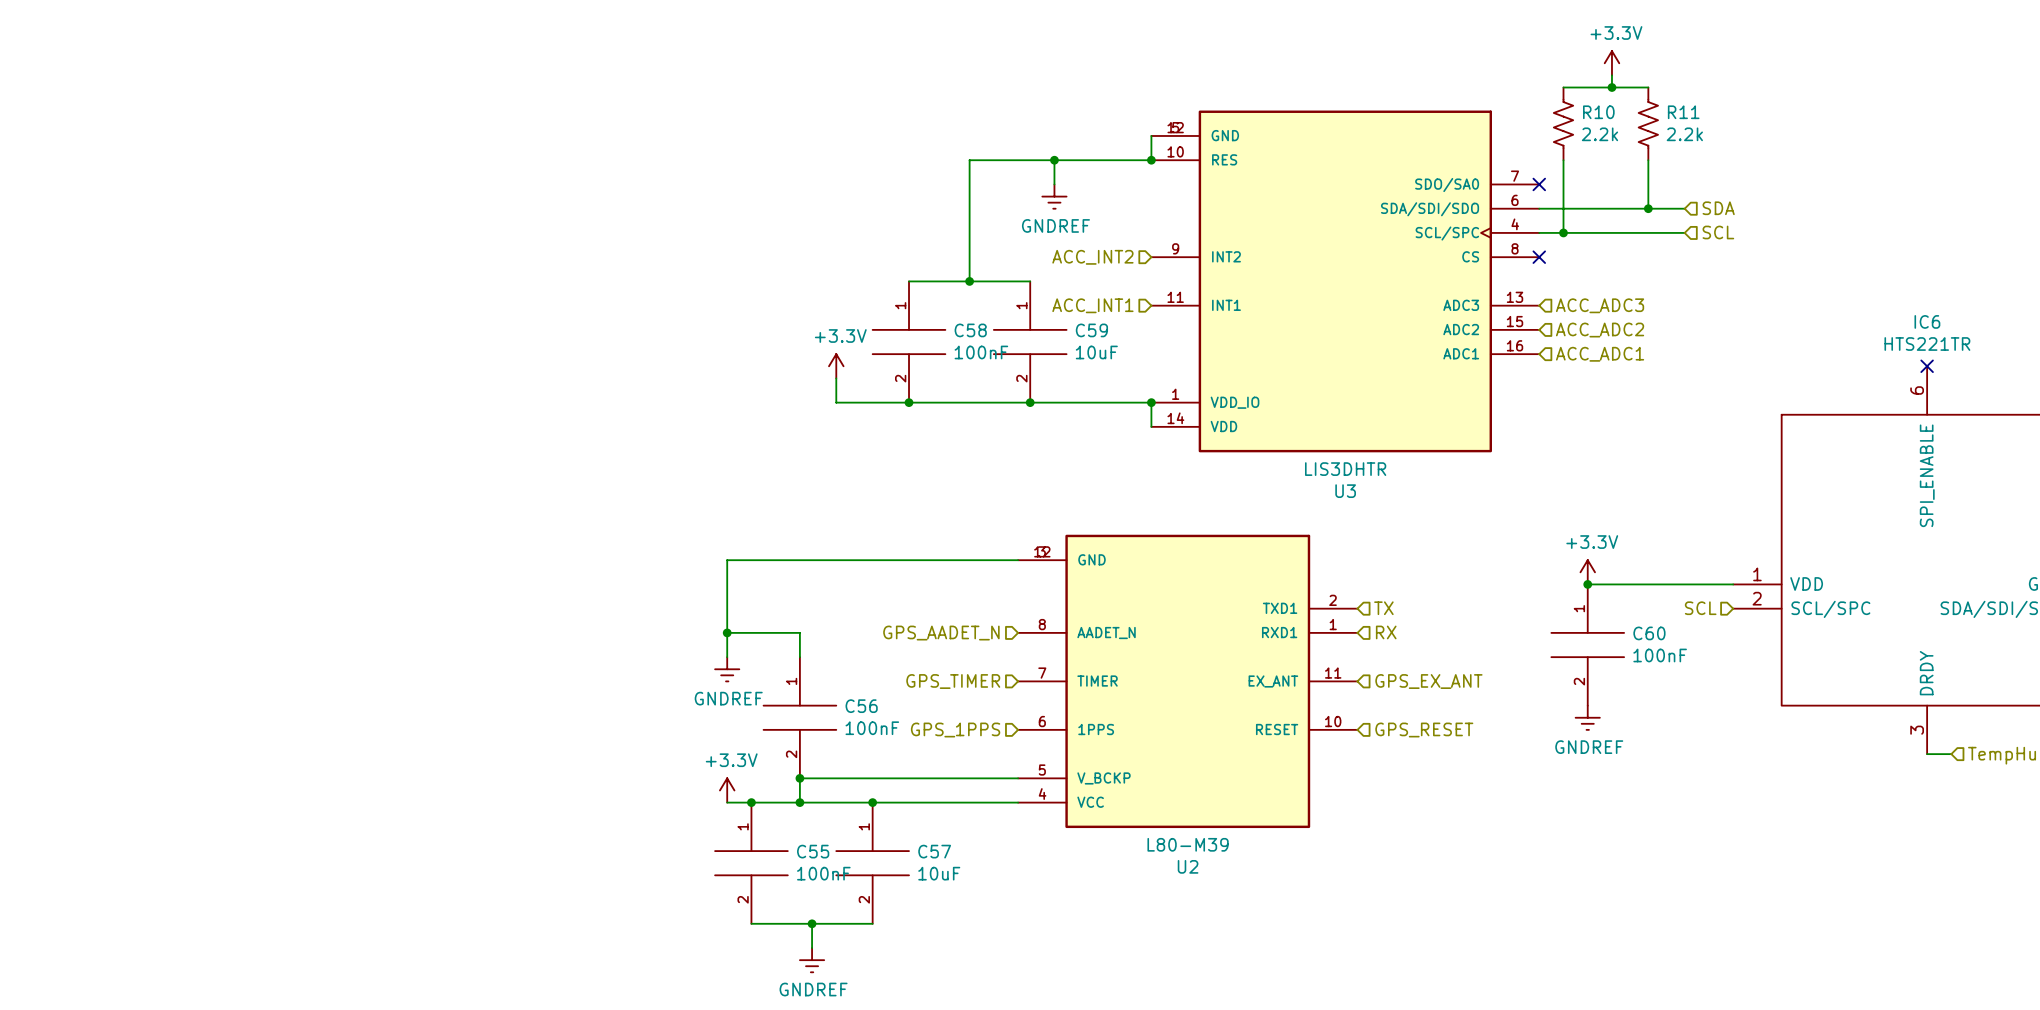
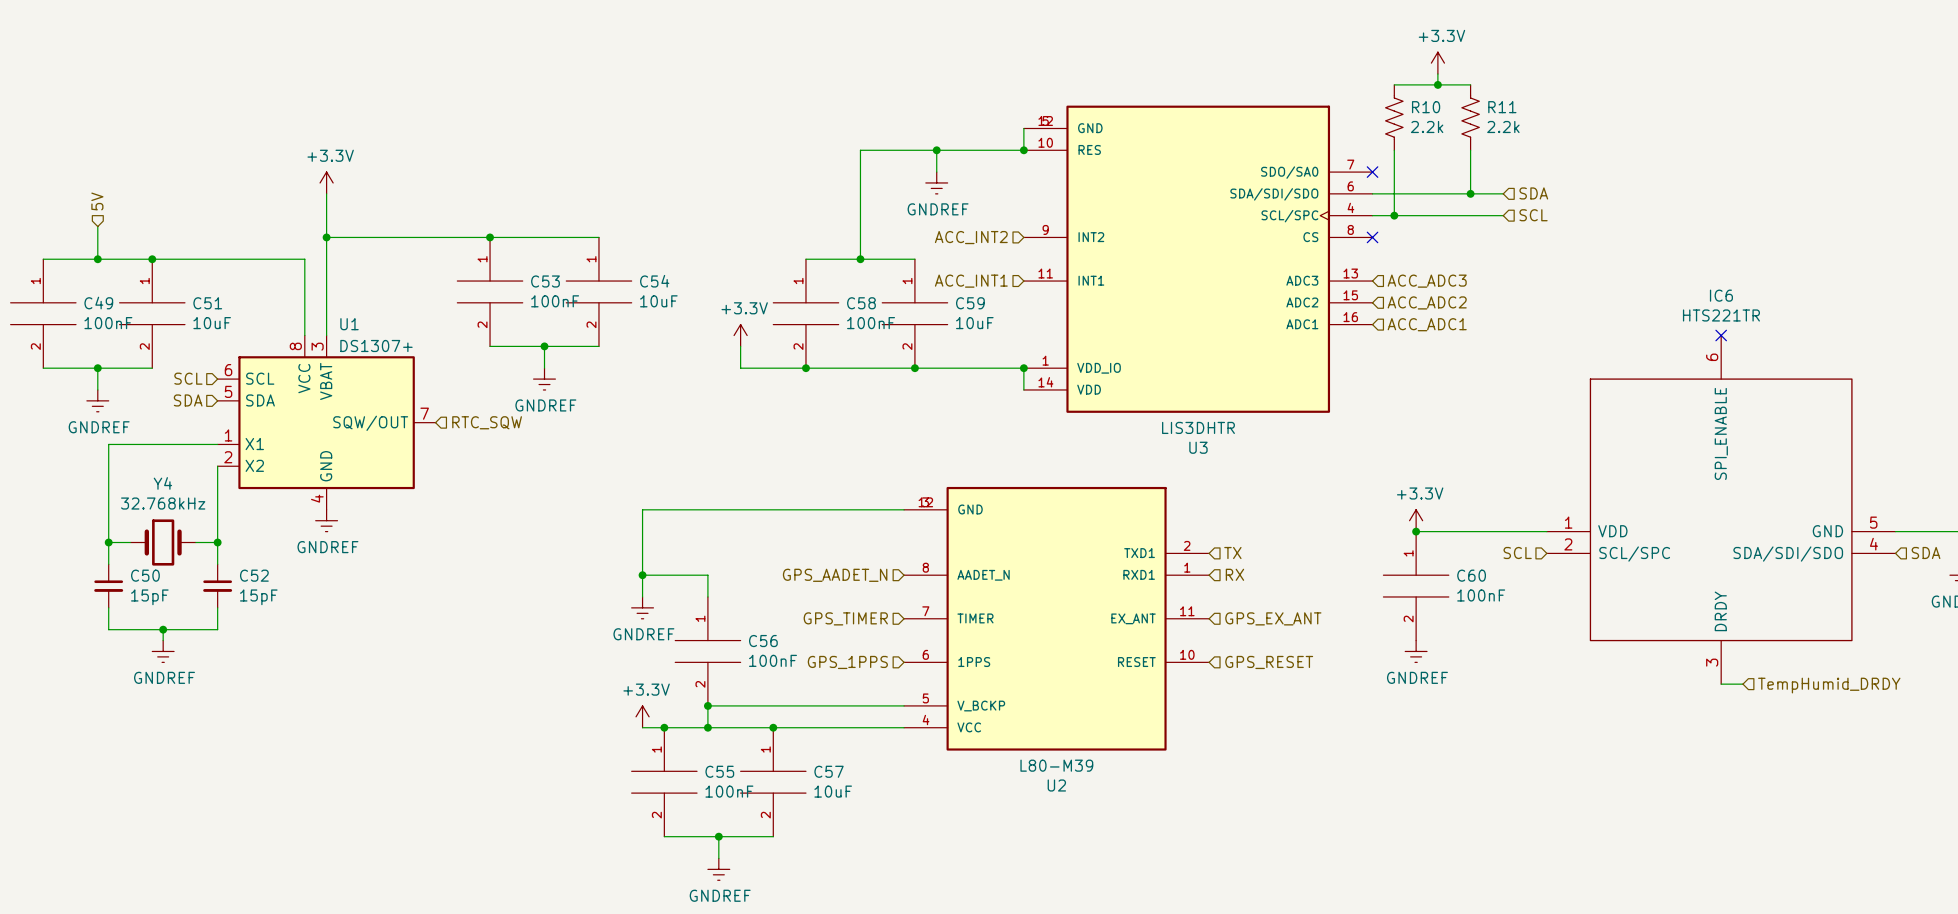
power symbol: none -> +3.3V (326, 182)
wire: none -> (326, 193) (326, 335)
hierarchical label: none -> 5V (97, 201)
wire: none -> (97, 226) (97, 259)
wire: none -> (326, 237) (598, 237)
junction: none -> (326, 237)
junction: none -> (490, 237)
wire: none -> (43, 259) (304, 259) (304, 335)
junction: none -> (97, 259)
junction: none -> (152, 259)
C53: none -> 100nF (490, 291)
C54: none -> 10uF (598, 291)
C49: none -> 100nF (43, 313)
C51: none -> 10uF (152, 313)
wire: none -> (490, 346) (598, 346)
wire: none -> (544, 346) (544, 368)
junction: none -> (544, 346)
wire: none -> (43, 368) (152, 368)
wire: none -> (97, 368) (97, 389)
junction: none -> (97, 368)
hierarchical label: none -> SCL (188, 378)
power symbol: none -> GNDREF (544, 379)
power symbol: none -> GNDREF (97, 400)
hierarchical label: none -> SDA (188, 400)
U1: none -> DS1307+ (326, 422)
hierarchical label: none -> RTC_SQW (487, 422)
wire: none -> (217, 444) (108, 444) (108, 564)
wire: none -> (217, 466) (217, 564)
power symbol: none -> GNDREF (326, 520)
wire: none -> (108, 542) (130, 542)
junction: none -> (108, 542)
Y4: none -> 32.768kHz (163, 542)
wire: none -> (195, 542) (217, 542)
junction: none -> (217, 542)
C50: none -> 15pF (108, 586)
C52: none -> 15pF (217, 586)
wire: none -> (108, 607) (108, 629) (217, 629) (217, 607)
wire: none -> (163, 629) (163, 640)
junction: none -> (163, 629)
power symbol: none -> GNDREF (163, 651)

